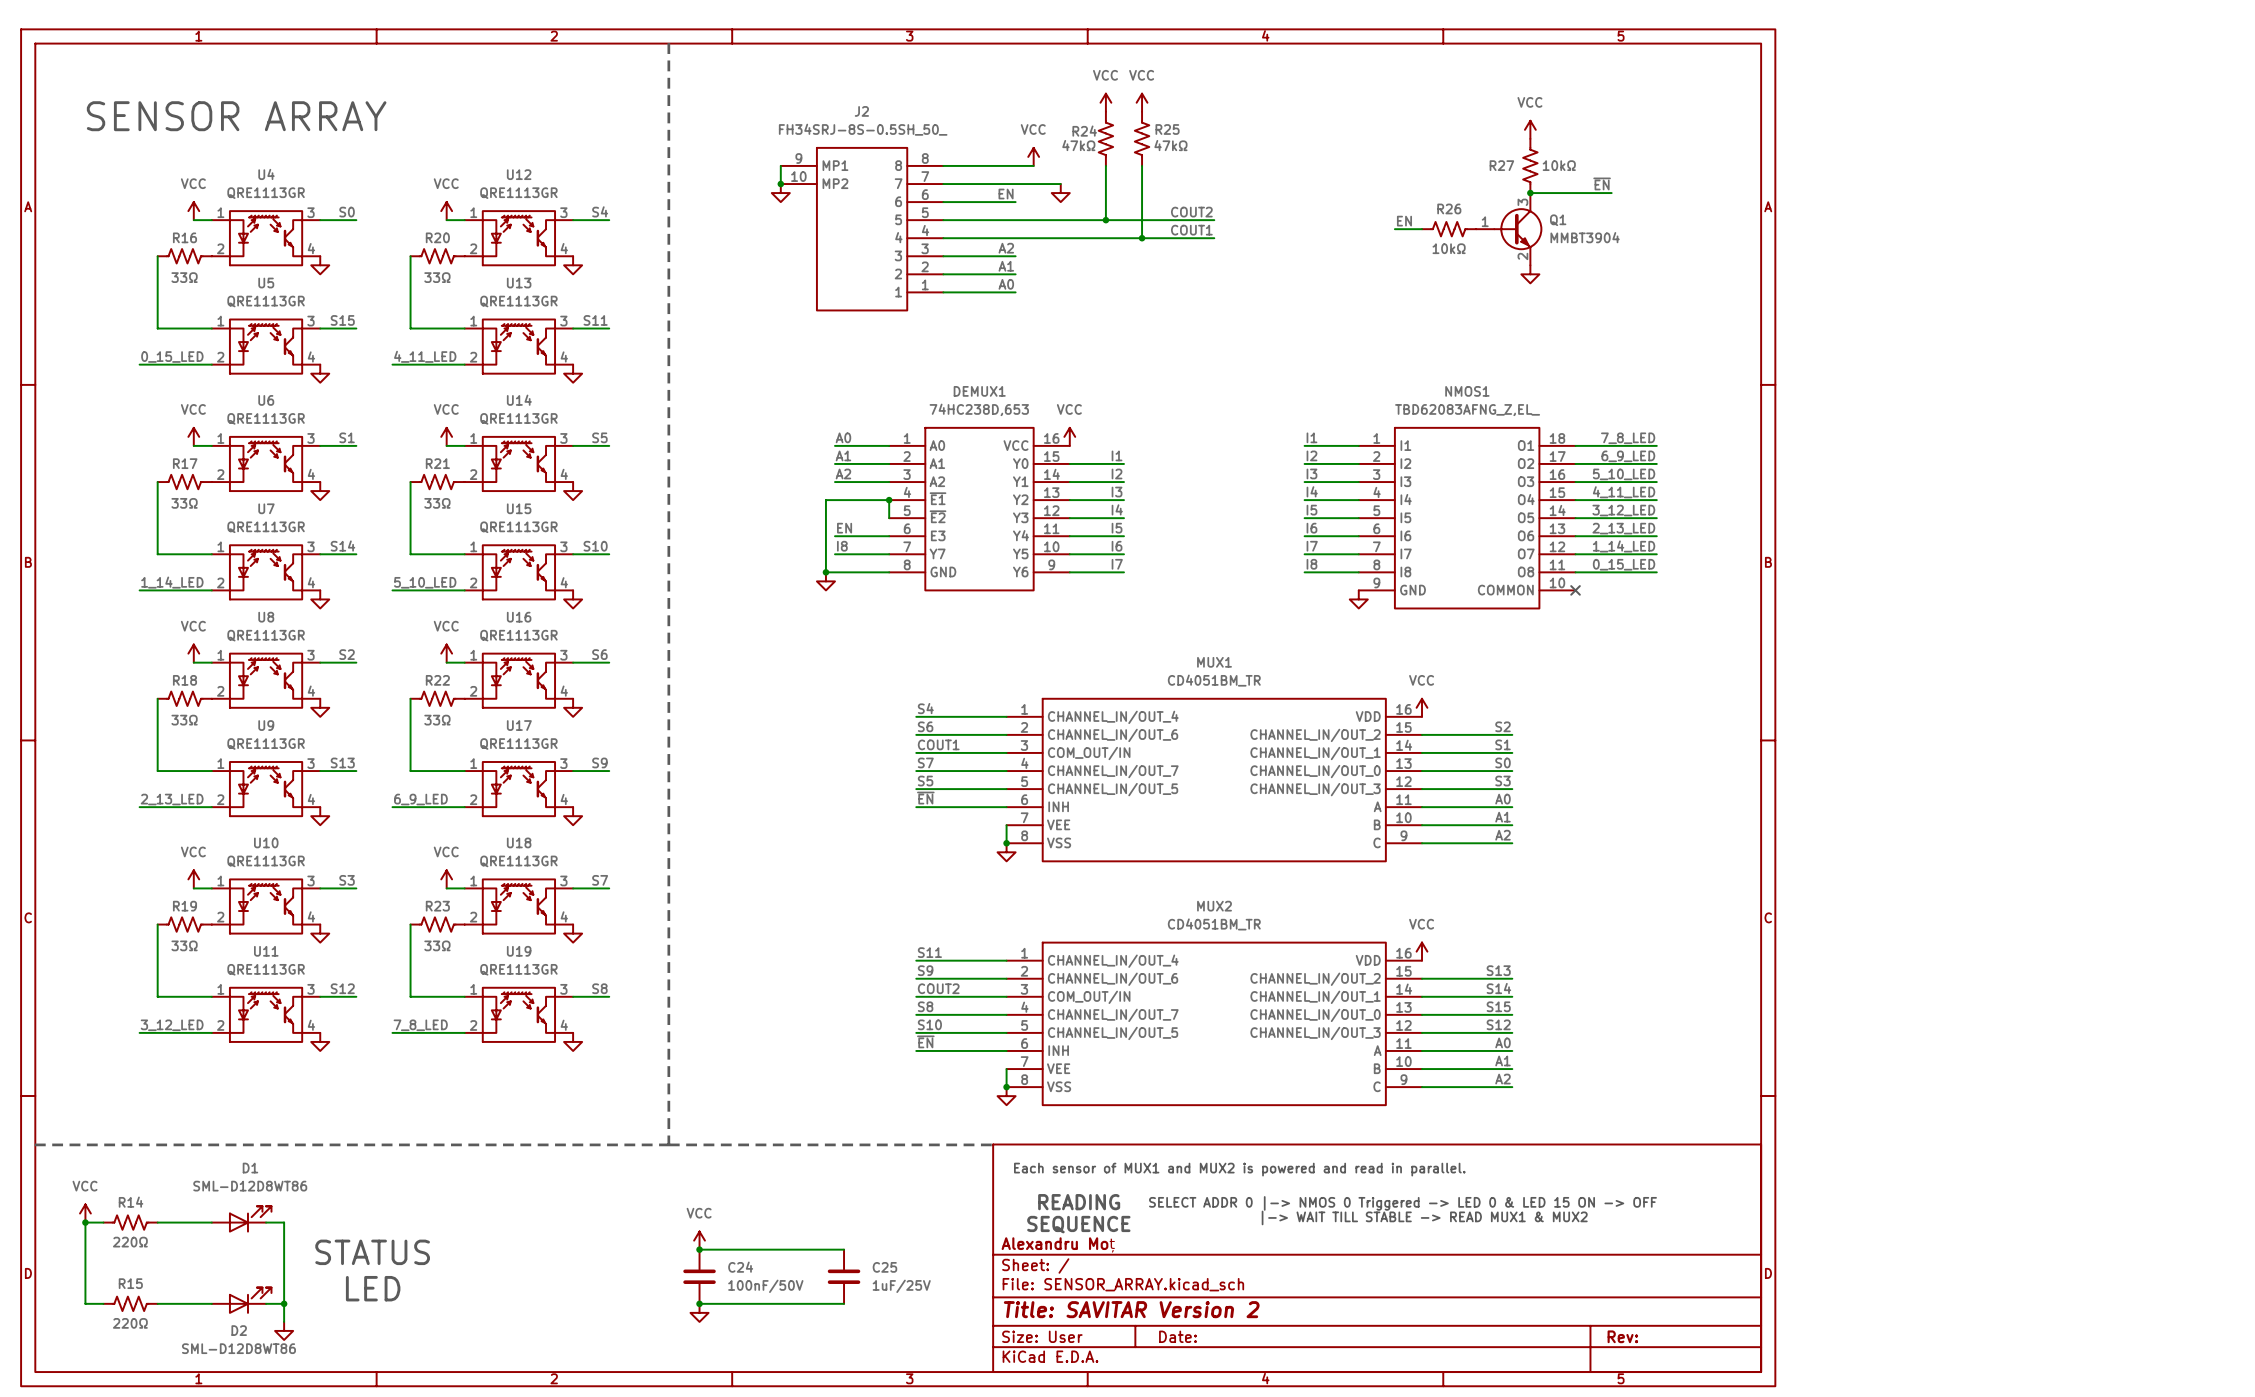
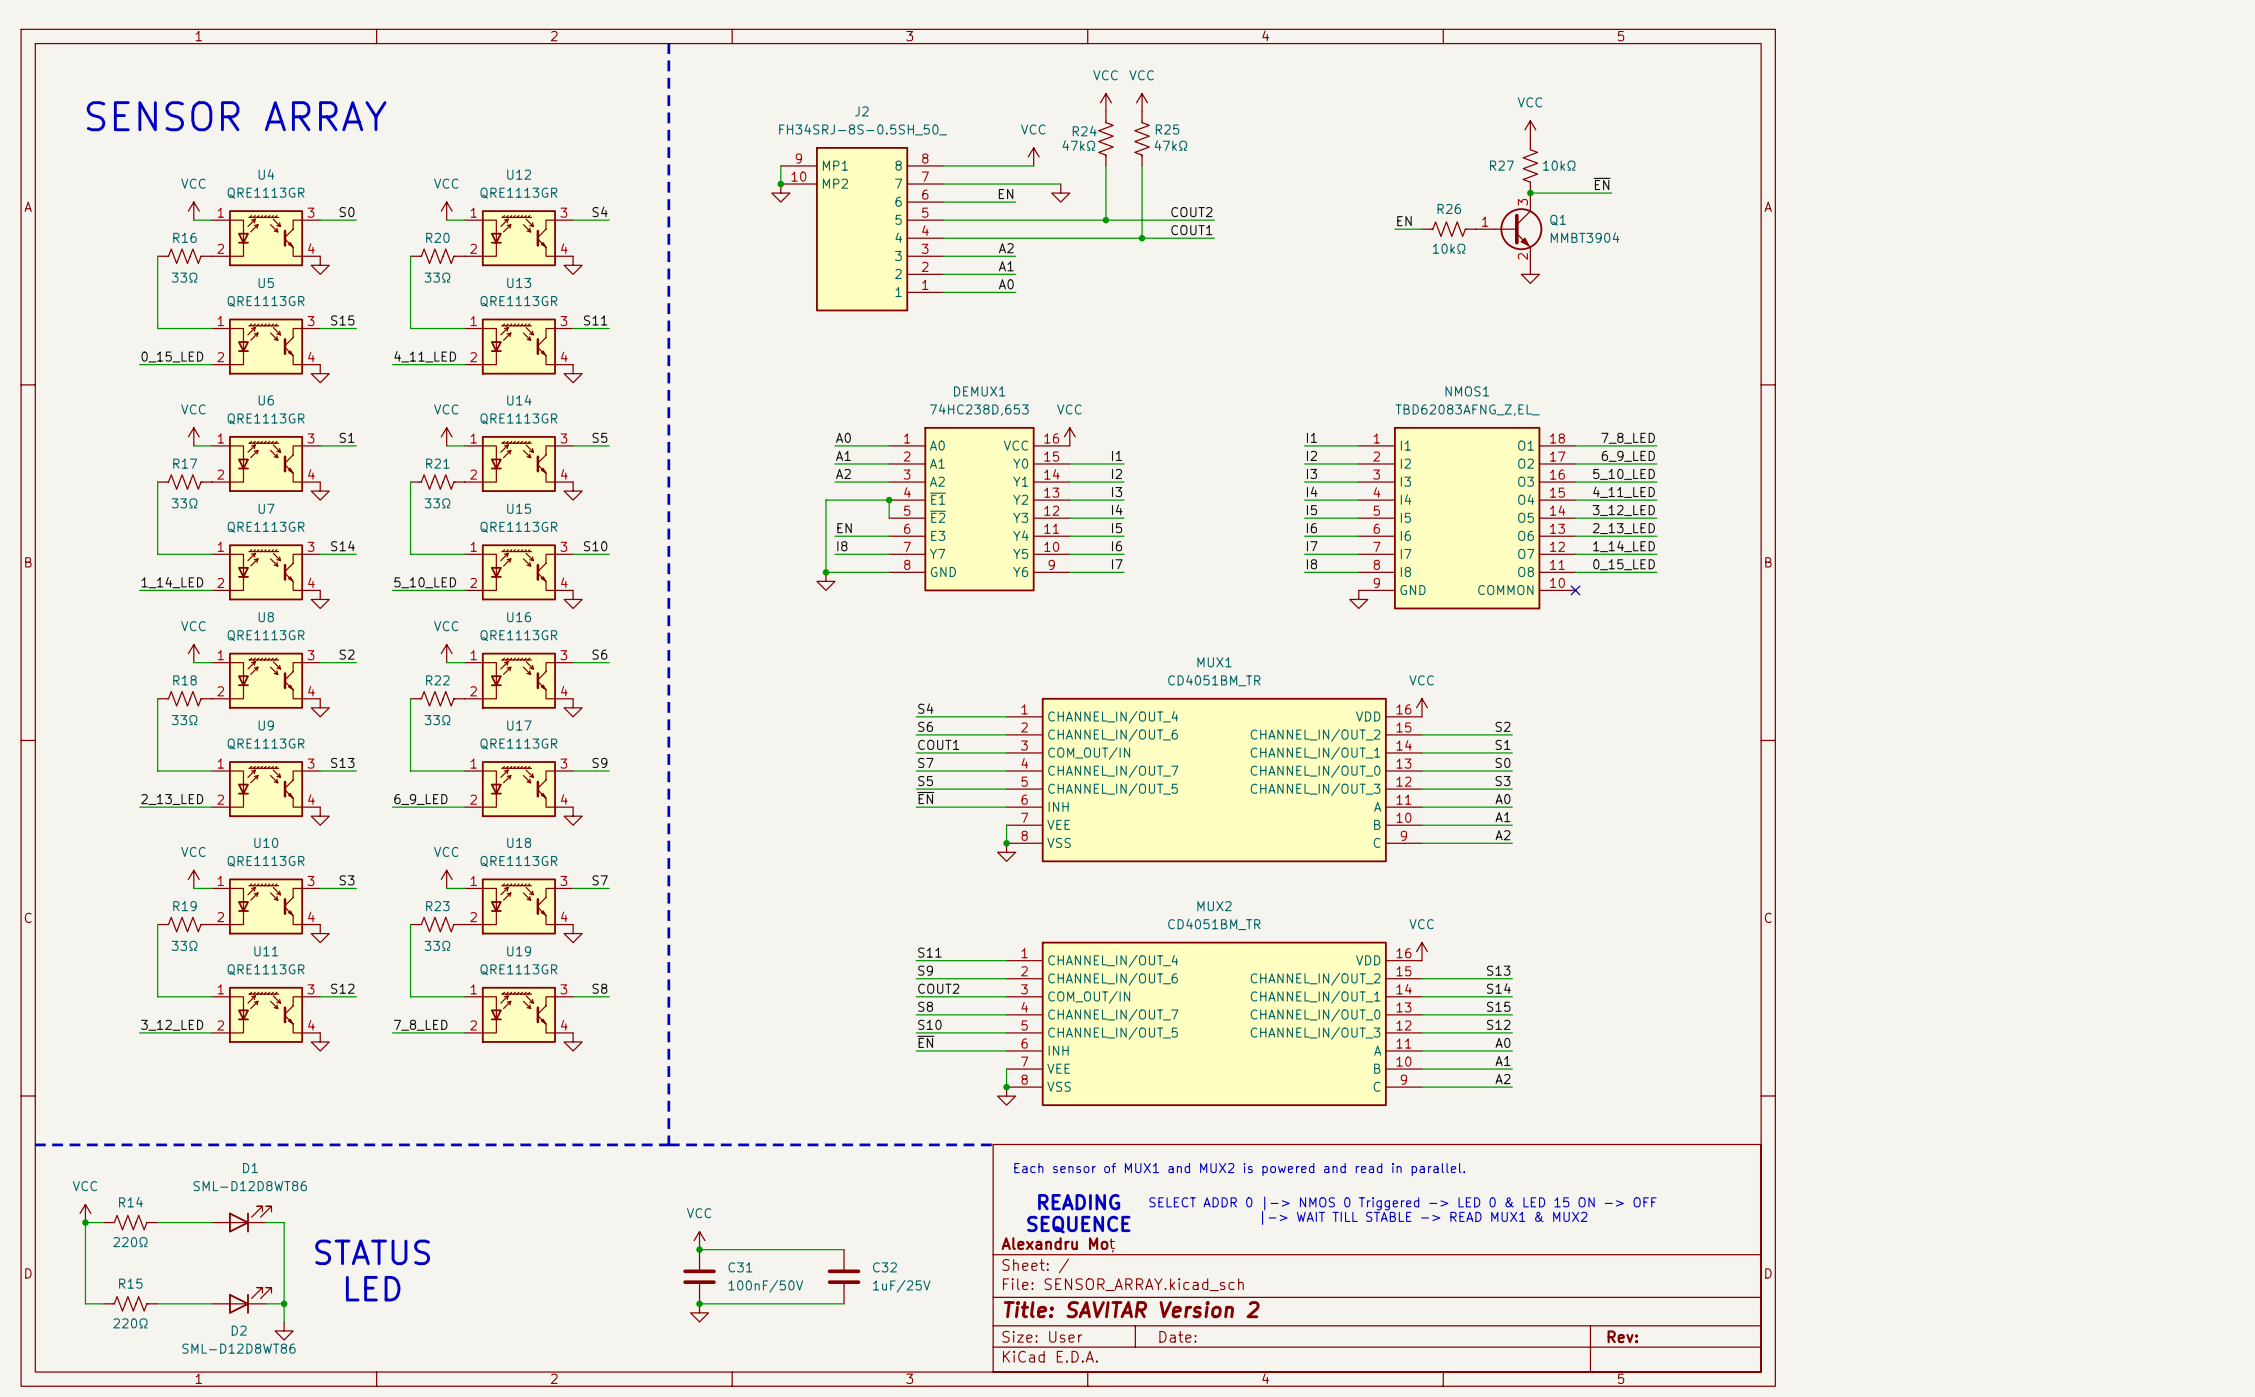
C24 name: C24 (740, 1267) -> C31 (740, 1267)
C25 name: C25 (884, 1267) -> C32 (884, 1267)

